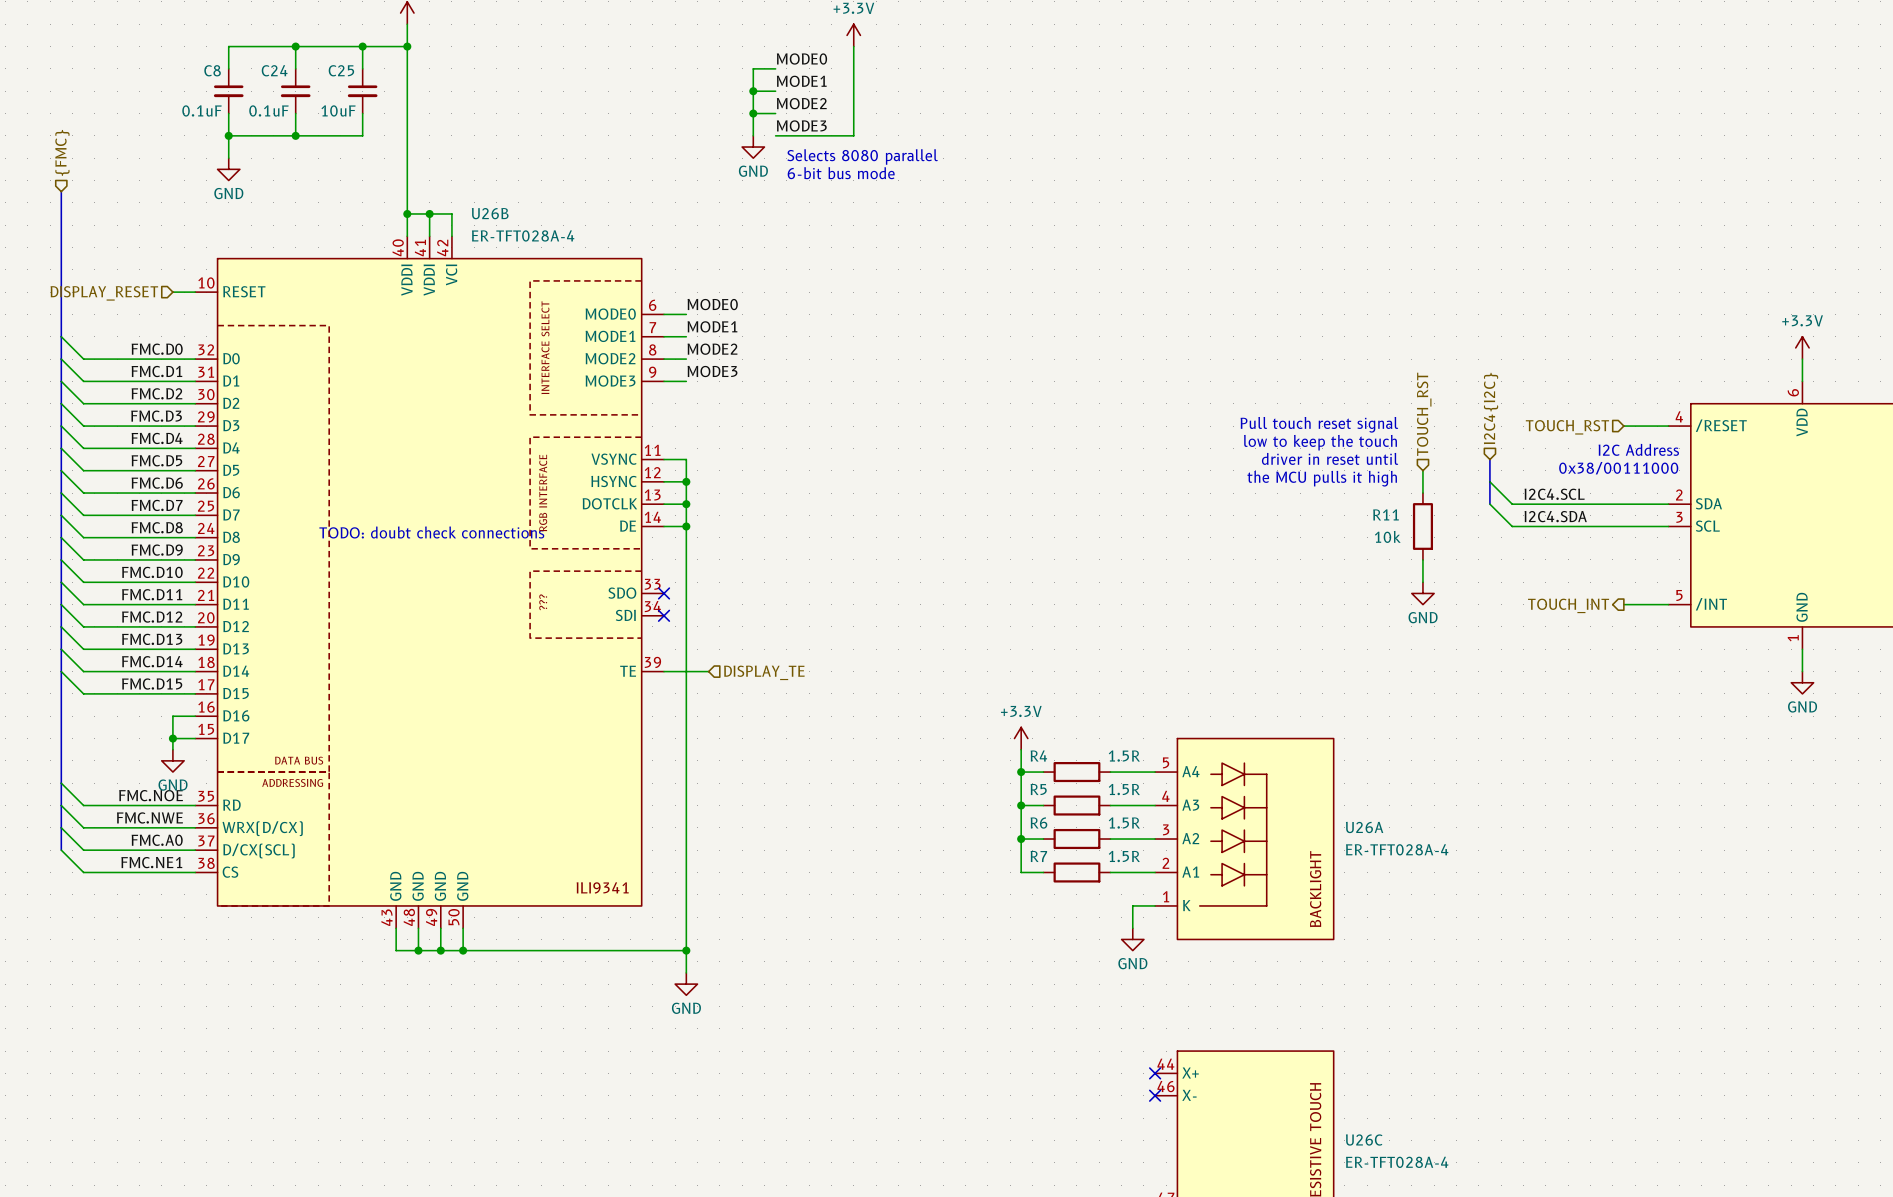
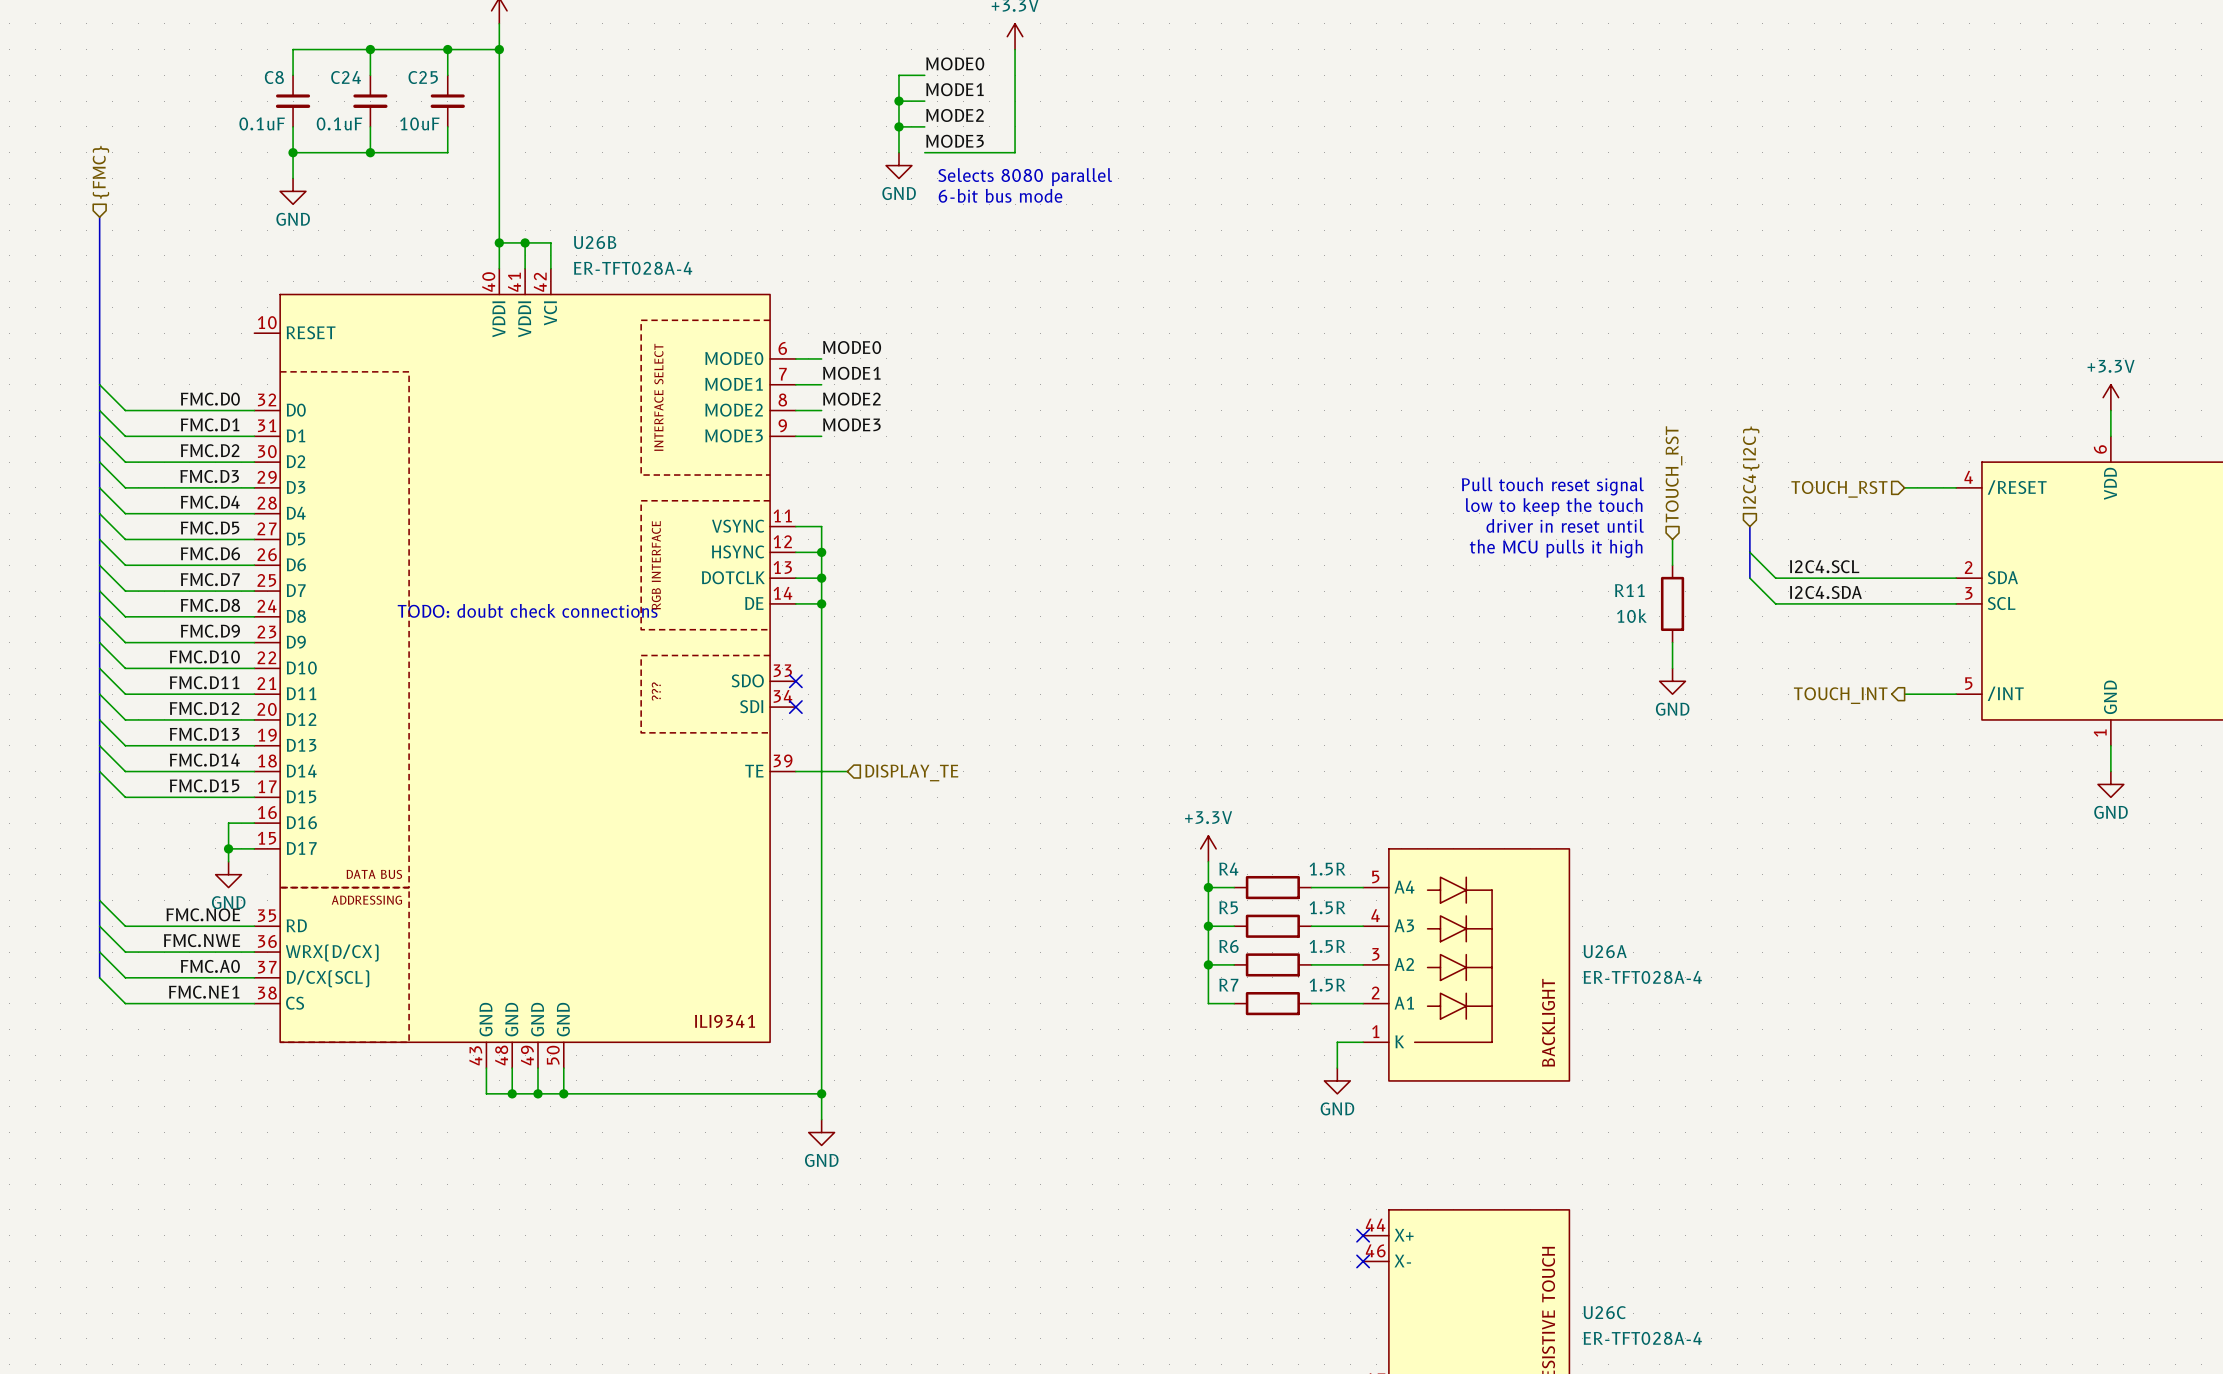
wire: (172, 292) (195, 292) -> none
hierarchical label: DISPLAY_RESET (104, 293) -> none
text: I2C Address (1638, 449) -> none
text: 0x38/00111000 (1618, 468) -> none

